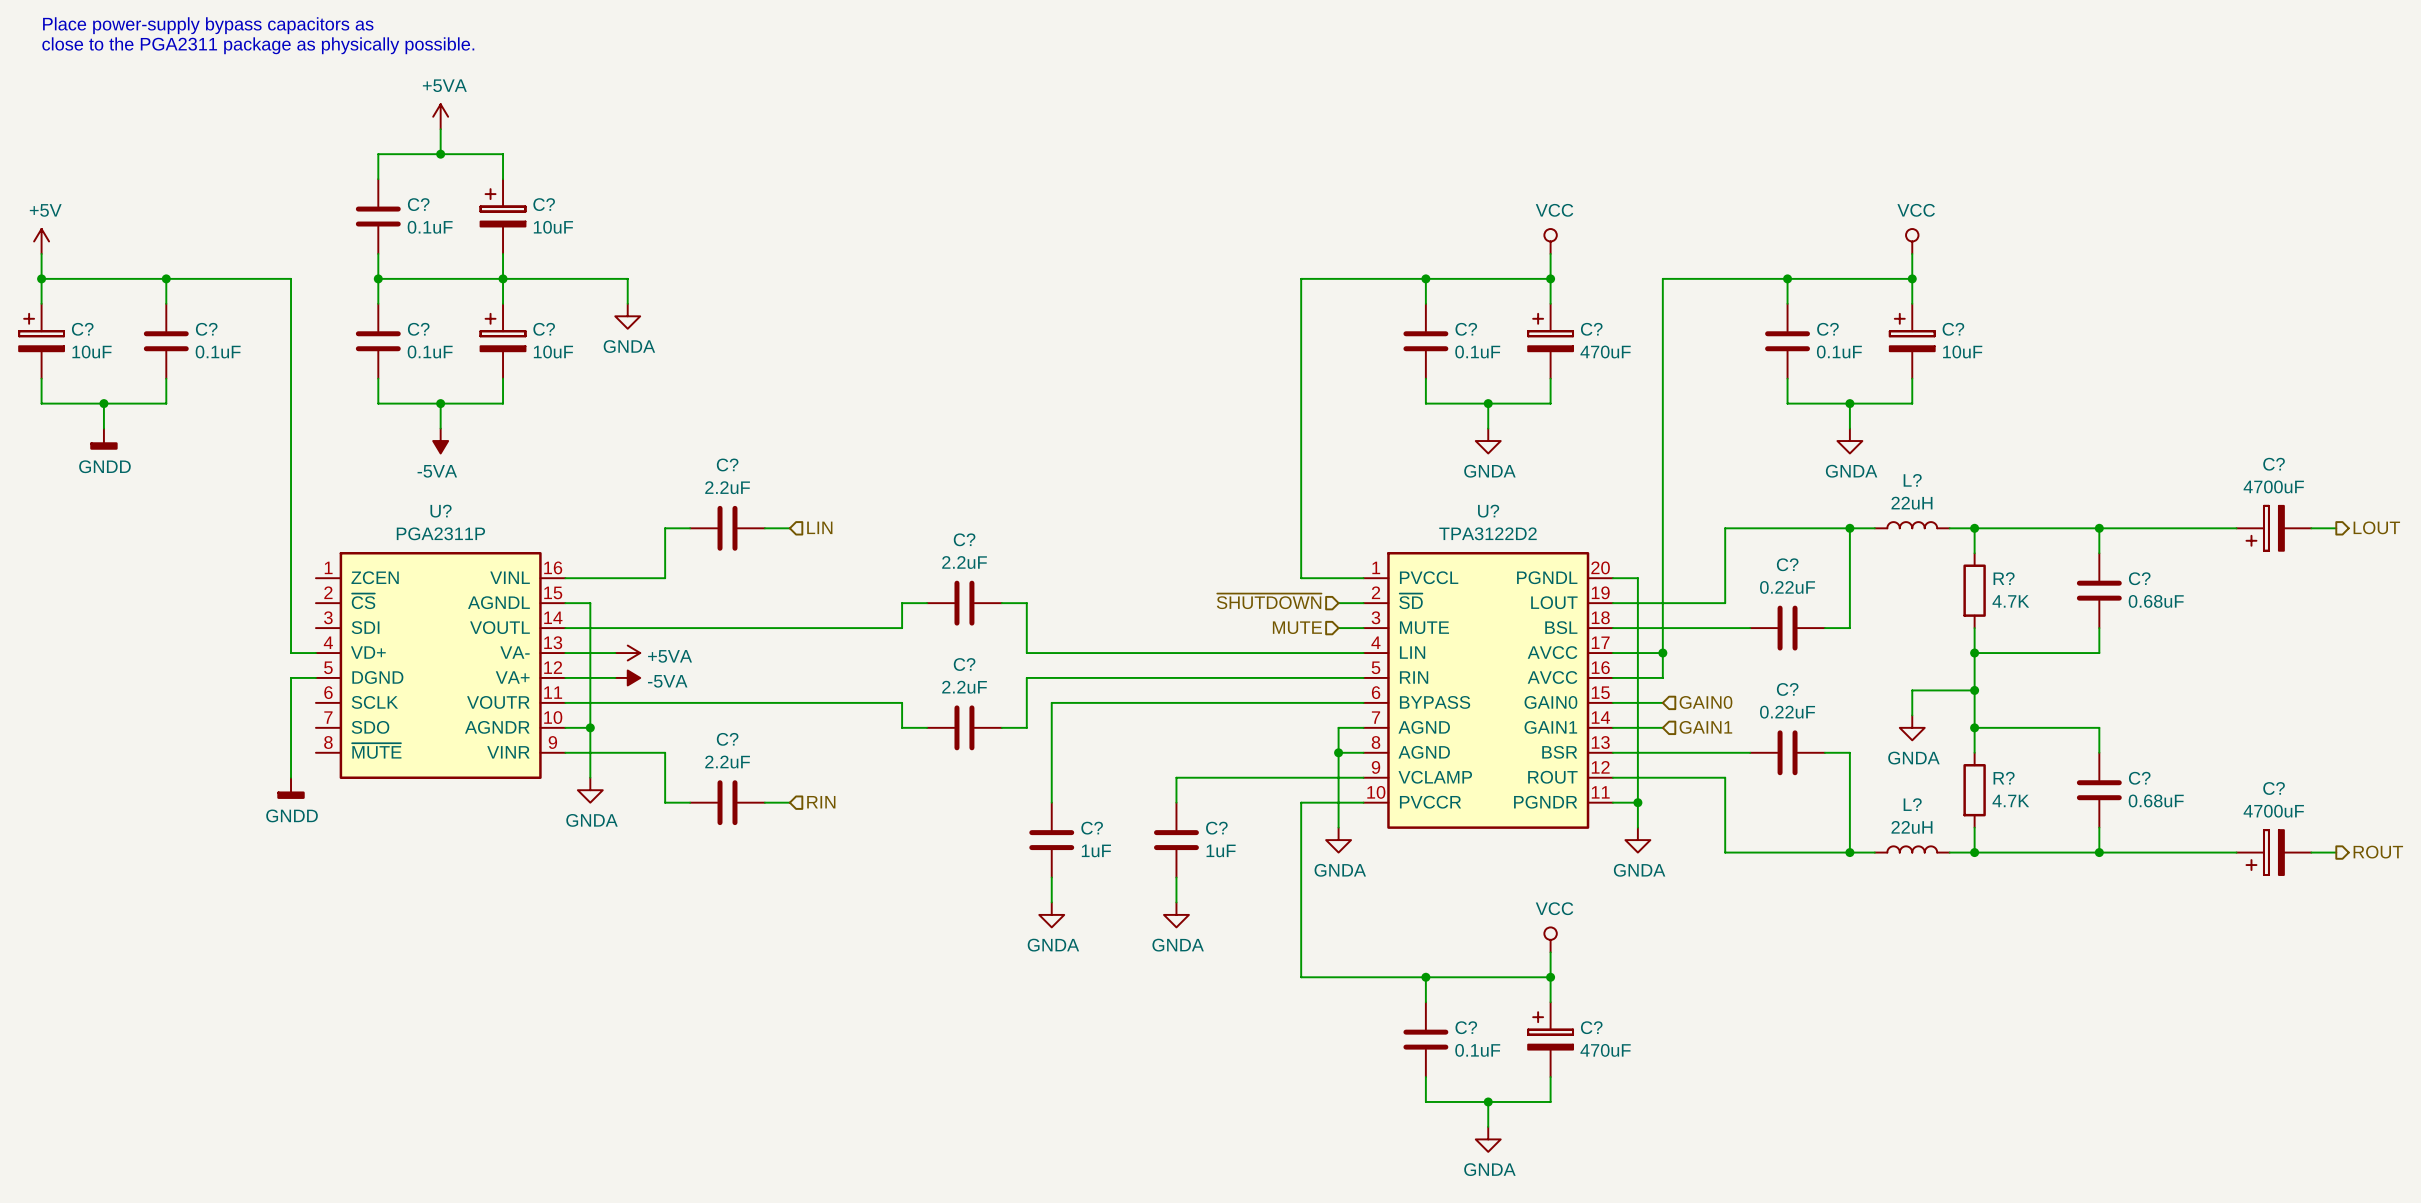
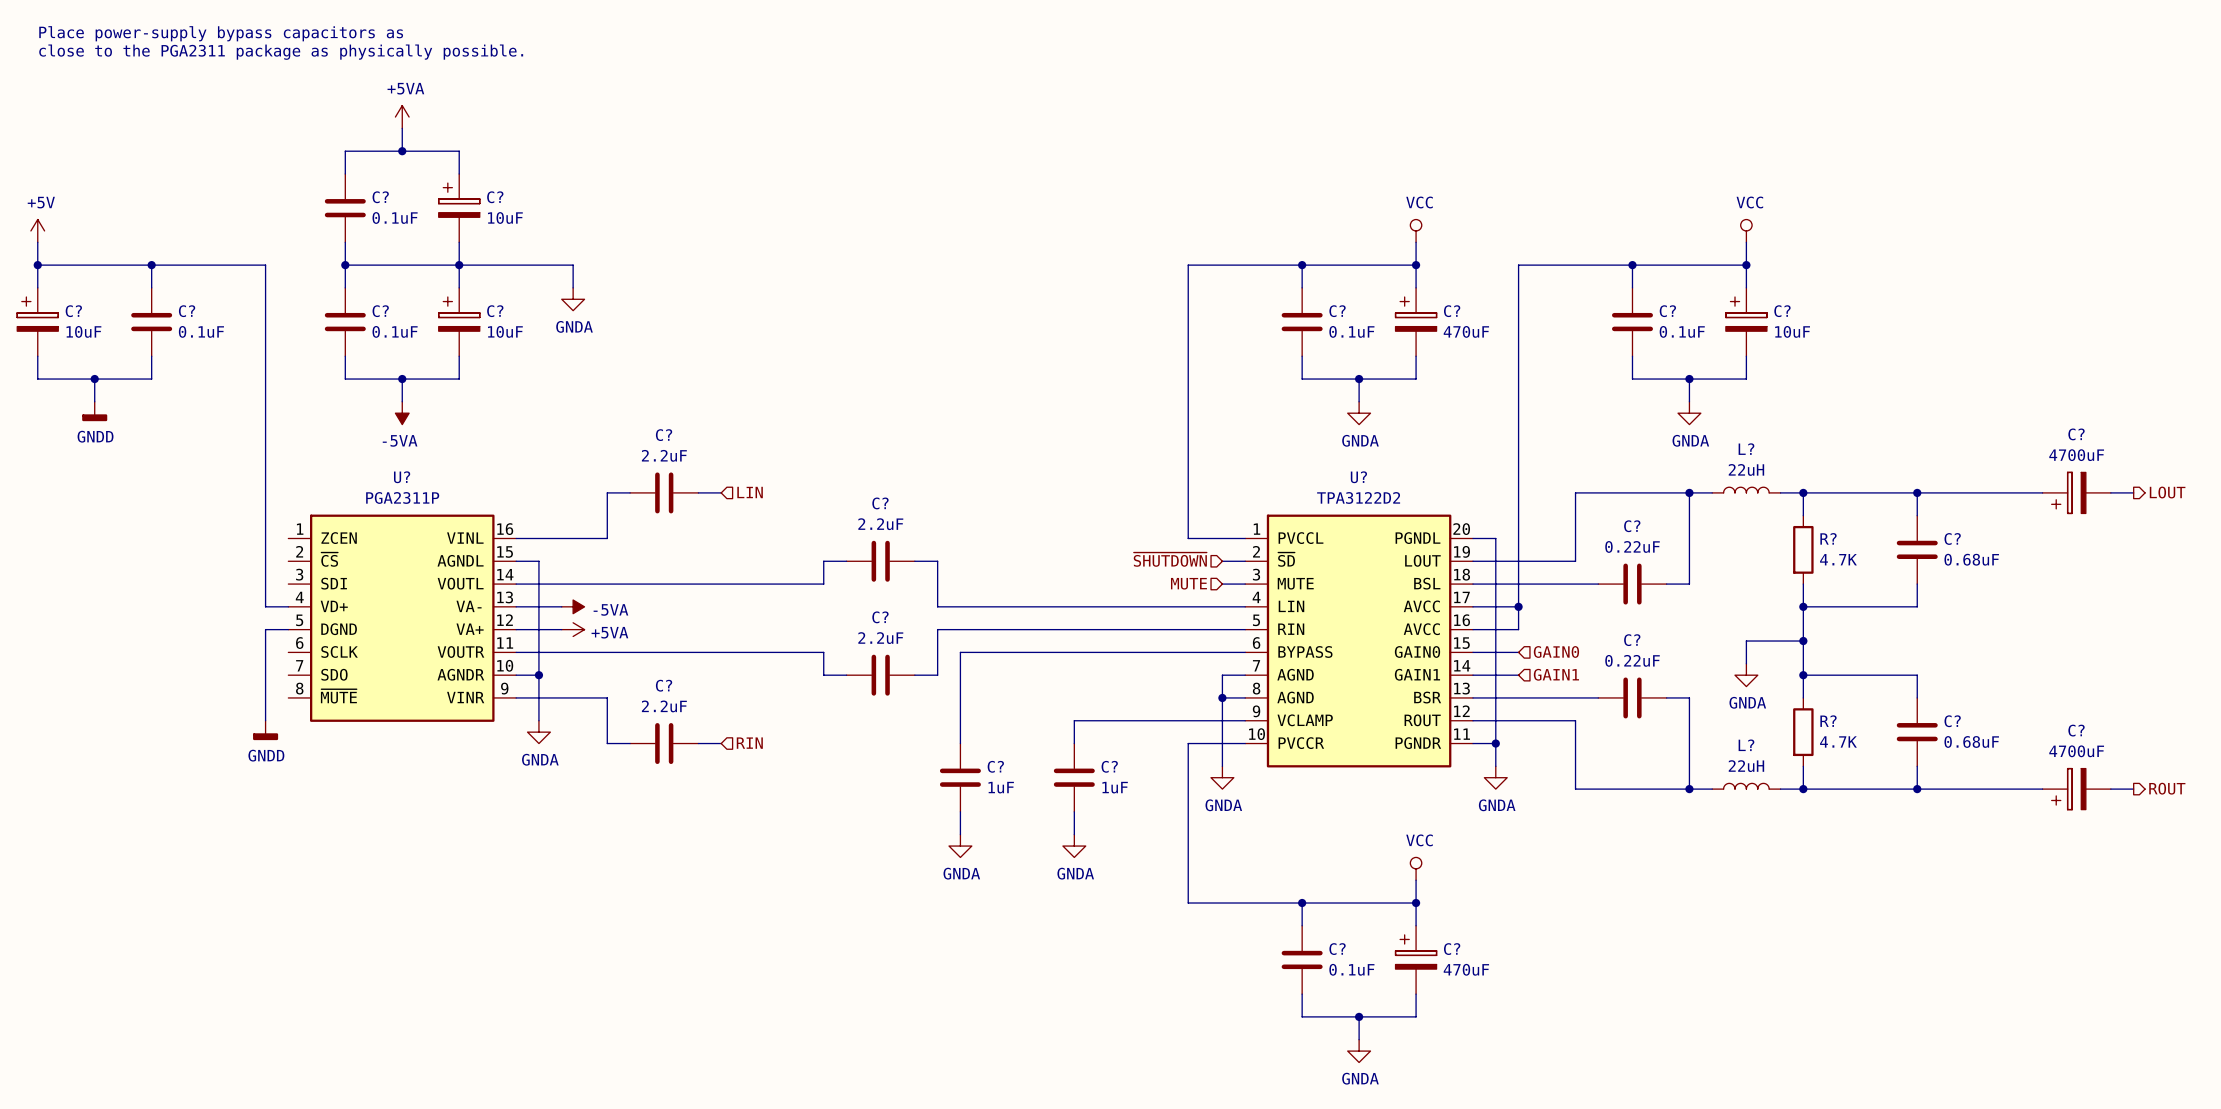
power symbol: +5VA (627, 653) -> -5VA (573, 606)
power symbol: -5VA (627, 677) -> +5VA (573, 629)

